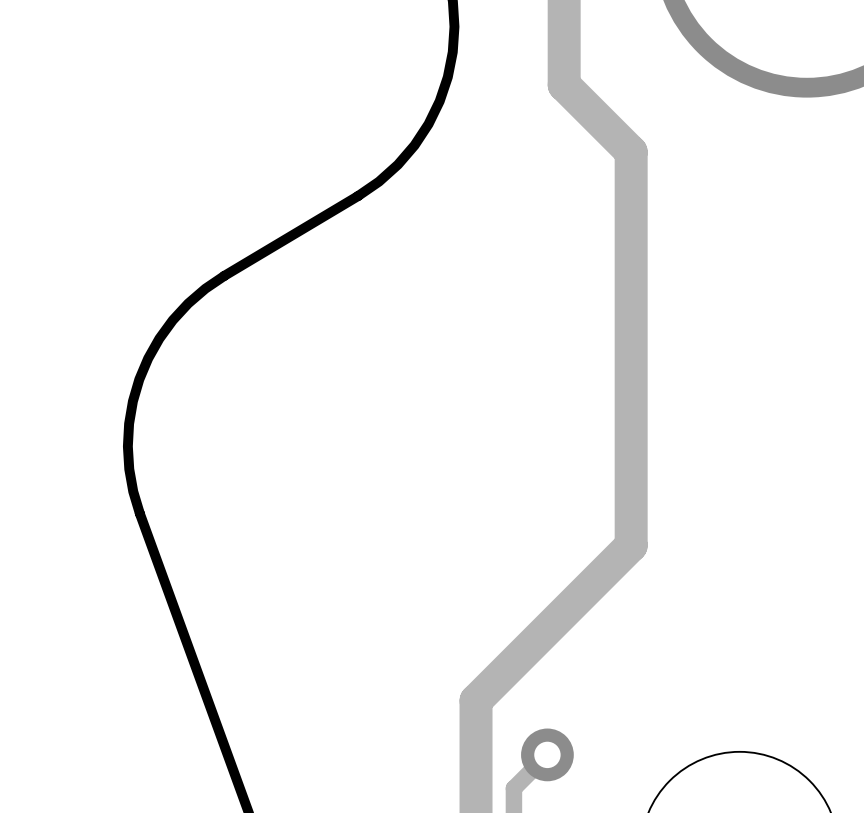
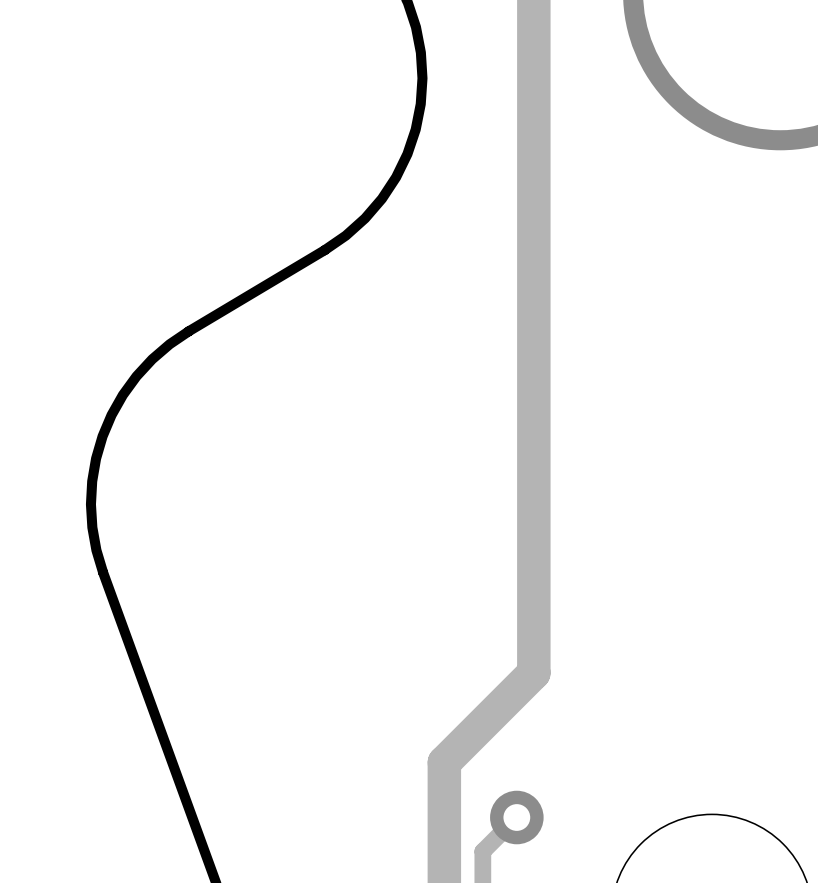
track: (564, 85) (631, 152) (631, 545) (564, 612) -> (533, 137) (533, 673)

